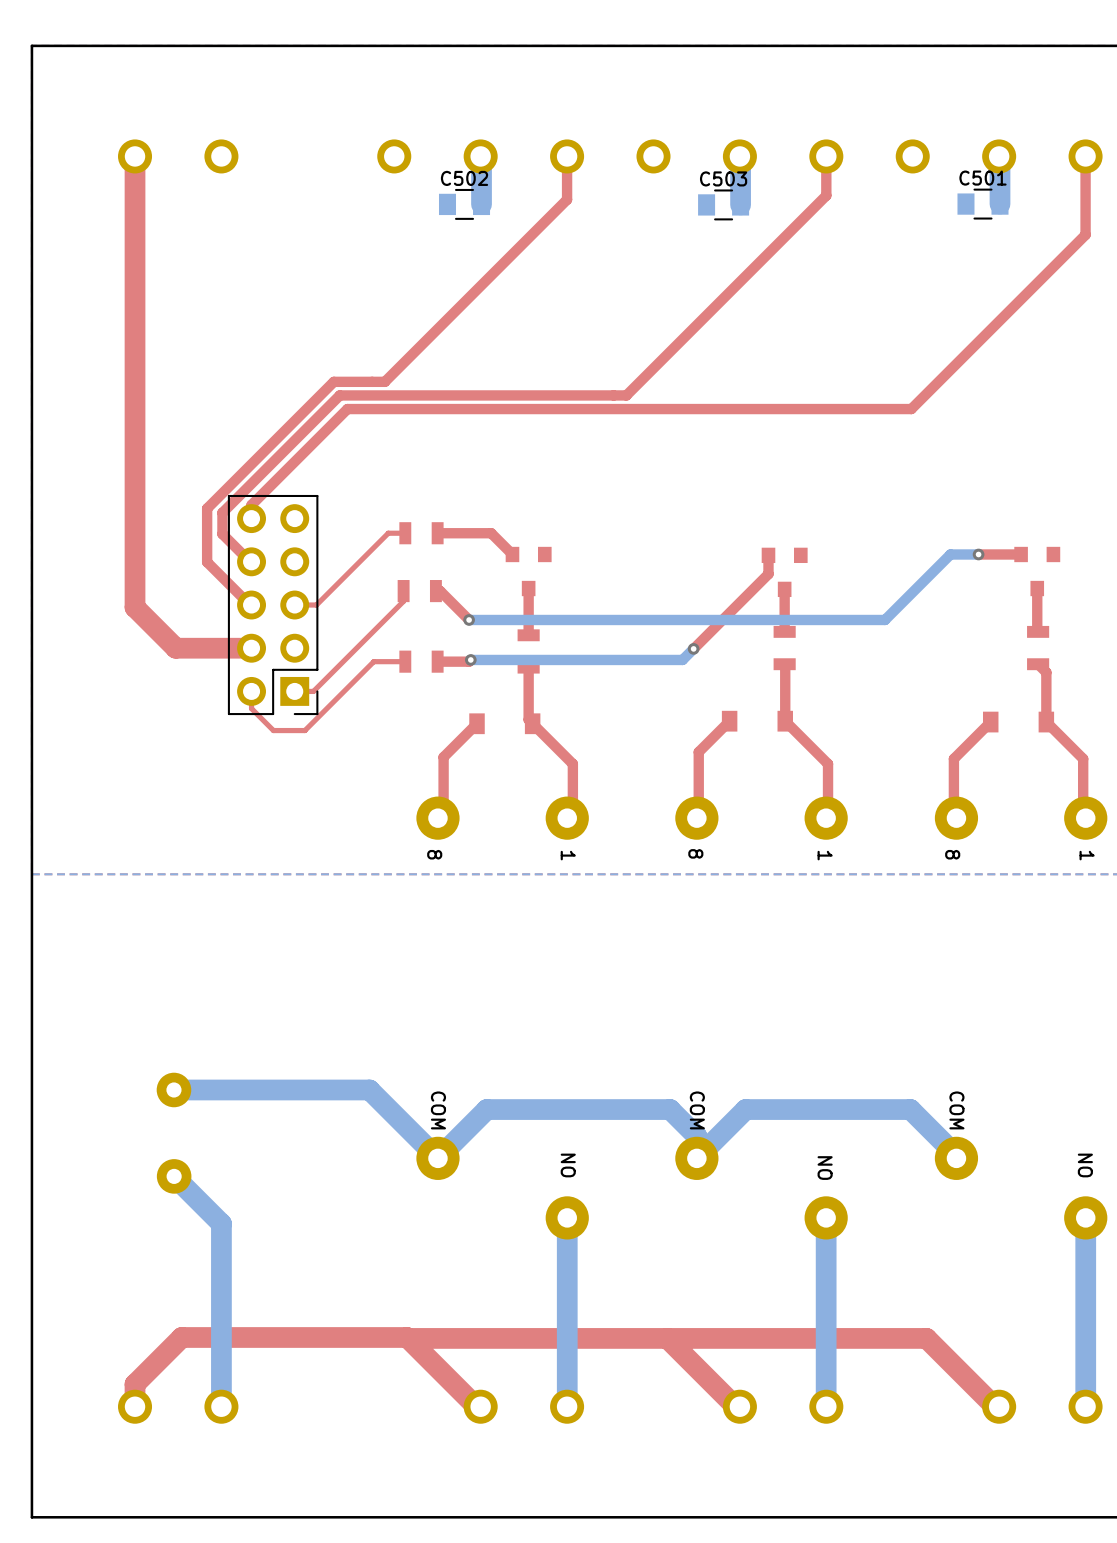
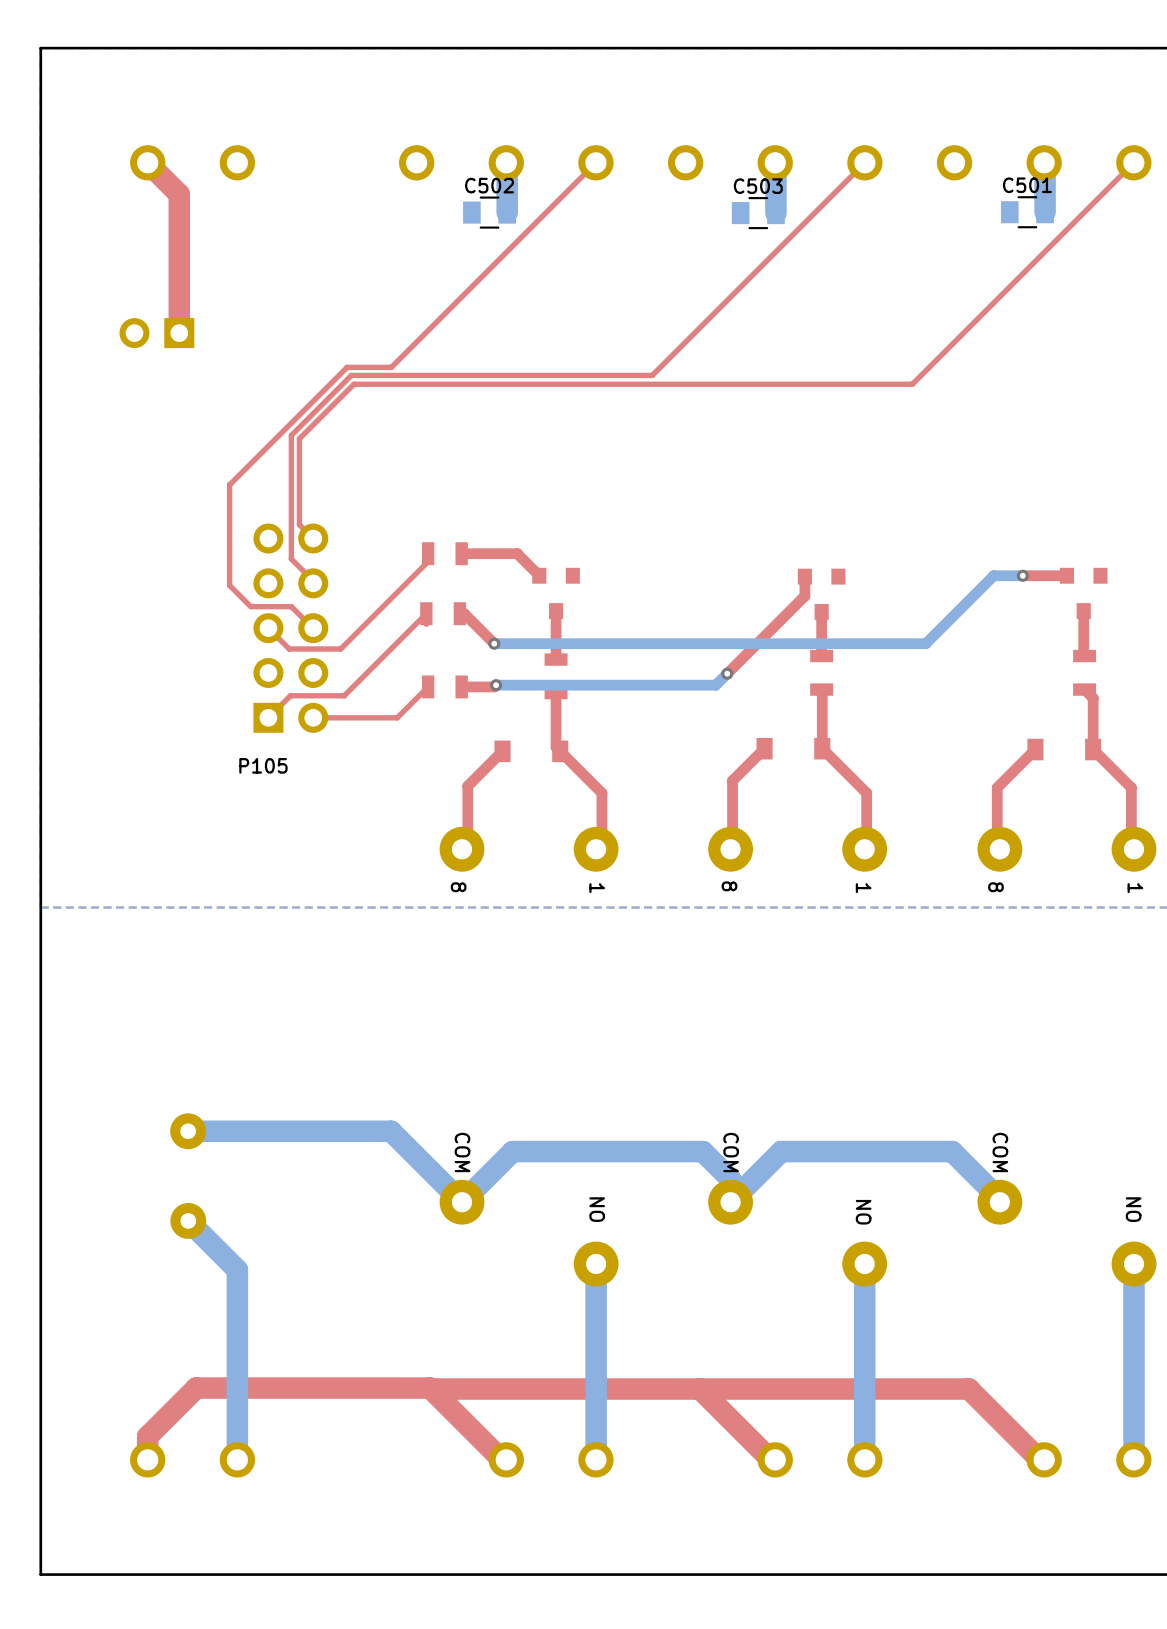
top track: (135, 156) (135, 607) (175, 648) (251, 648) -> (147, 162) (179, 194) (179, 333)
top track: (567, 156) (567, 199) (384, 381) (333, 381) (207, 508) (207, 562) (250, 605) -> (595, 162) (391, 367) (347, 367) (229, 484) (229, 585) (250, 606) (291, 606) (312, 628)
top track: (826, 156) (826, 195) (626, 395) (339, 395) (222, 512) (222, 534) (250, 561) -> (864, 162) (652, 375) (351, 375) (291, 435) (291, 558) (313, 580) (313, 583)
top track: (1085, 156) (1085, 234) (911, 409) (347, 409) (251, 504) (251, 518) -> (1133, 162) (912, 384) (353, 384) (299, 438) (299, 524) (313, 538)
part: none -> (156, 333)
top track: (405, 533) (388, 533) (316, 605) (294, 605) -> (428, 553) (428, 561) (340, 648) (289, 648) (268, 628)
top track: (403, 601) (313, 691) -> (428, 686) (397, 717) (332, 717)
P105 side: bottom (273, 605) -> top (290, 628)
top track: (405, 661) (373, 661) (304, 730) (273, 730) (251, 708) (251, 691) -> (426, 613) (344, 695) (290, 695) (268, 717)

